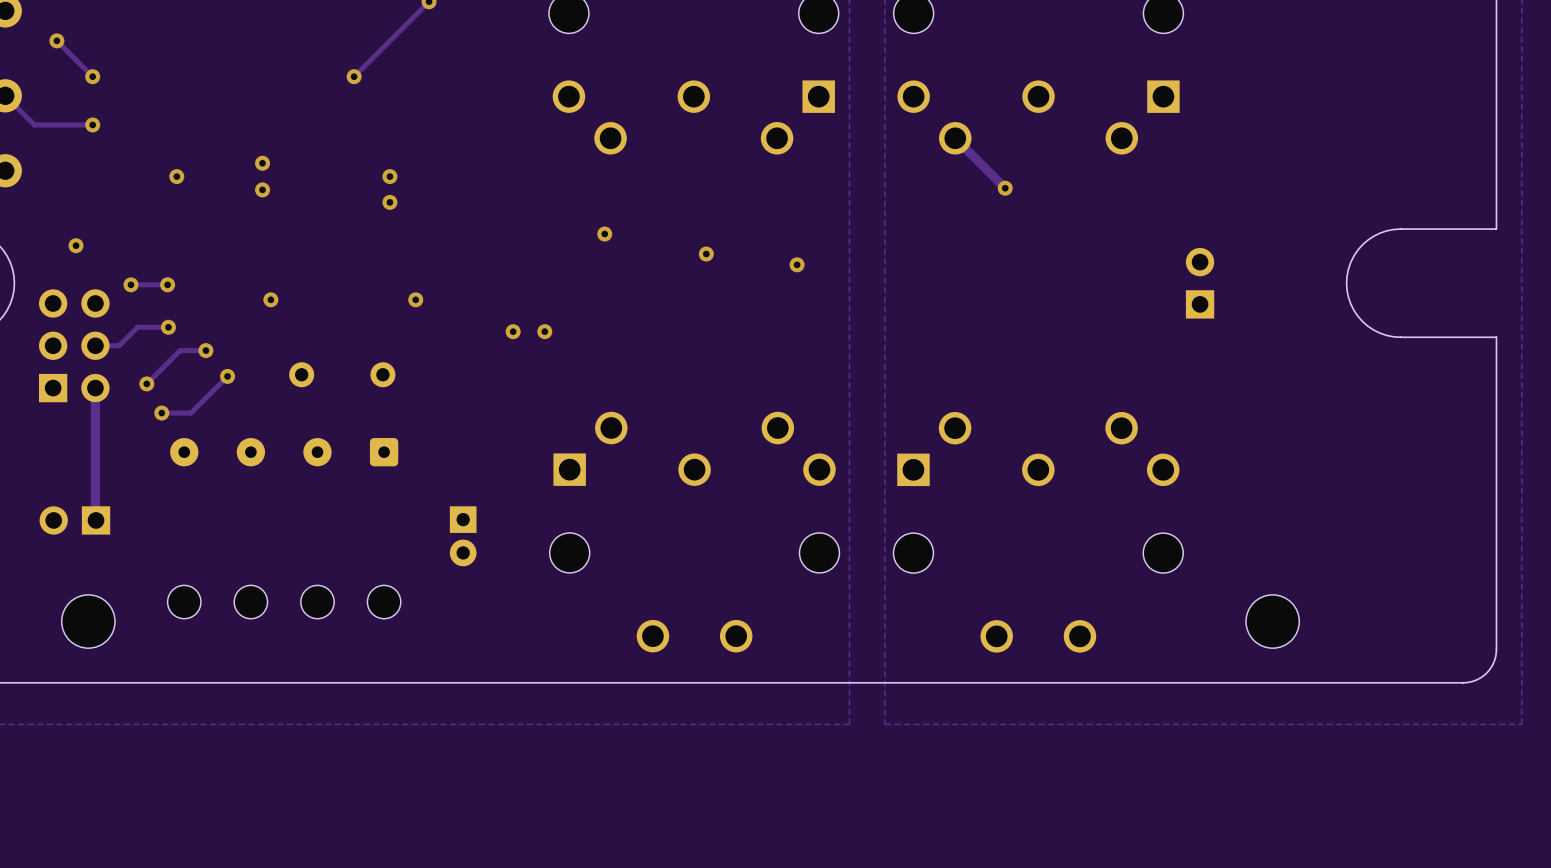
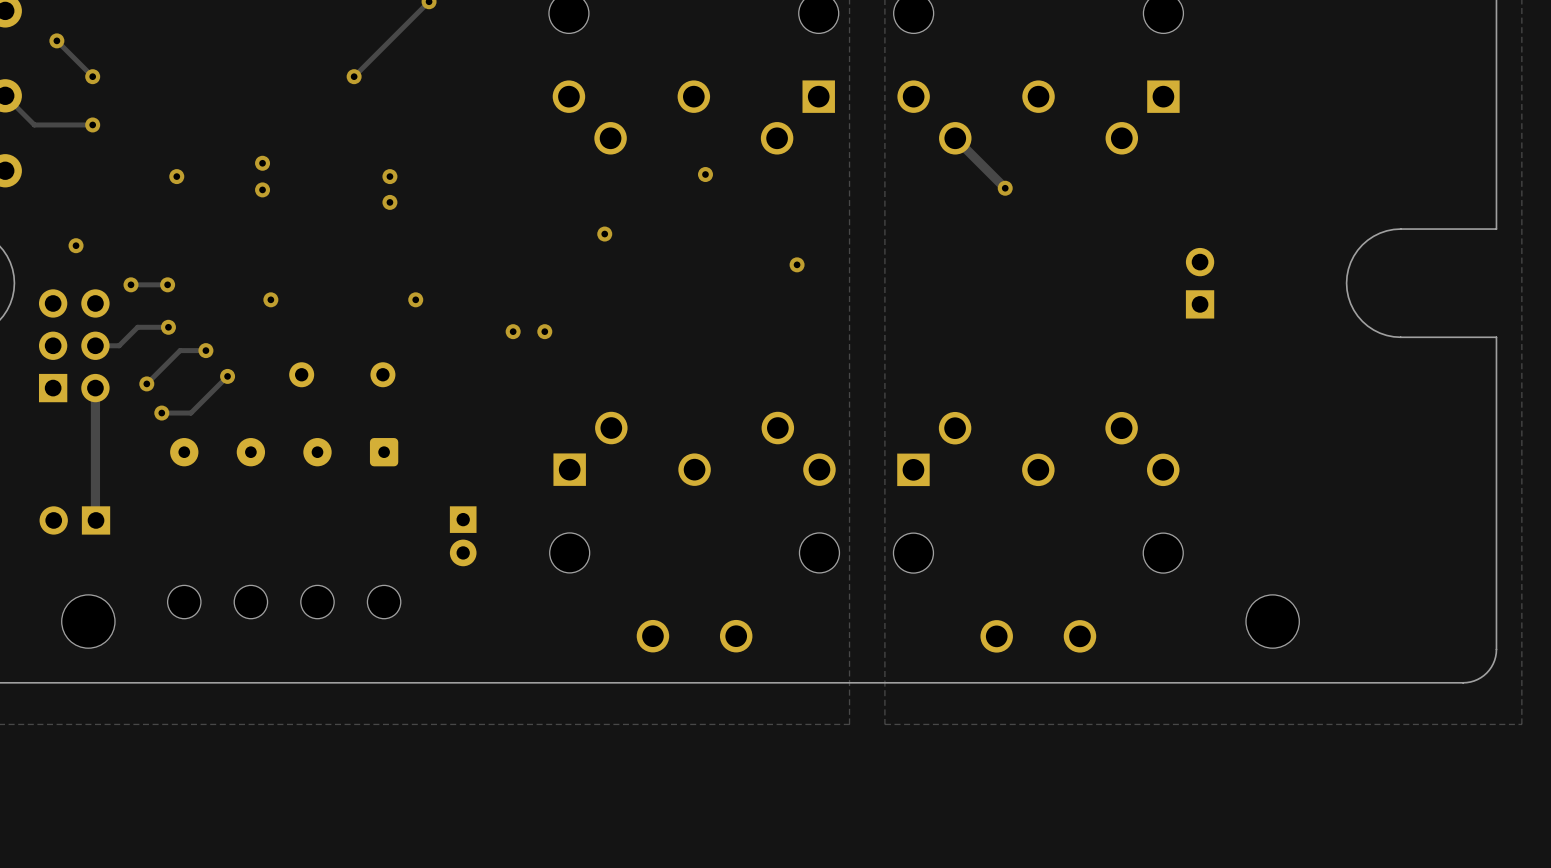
via position: (706, 254) -> (705, 174)

